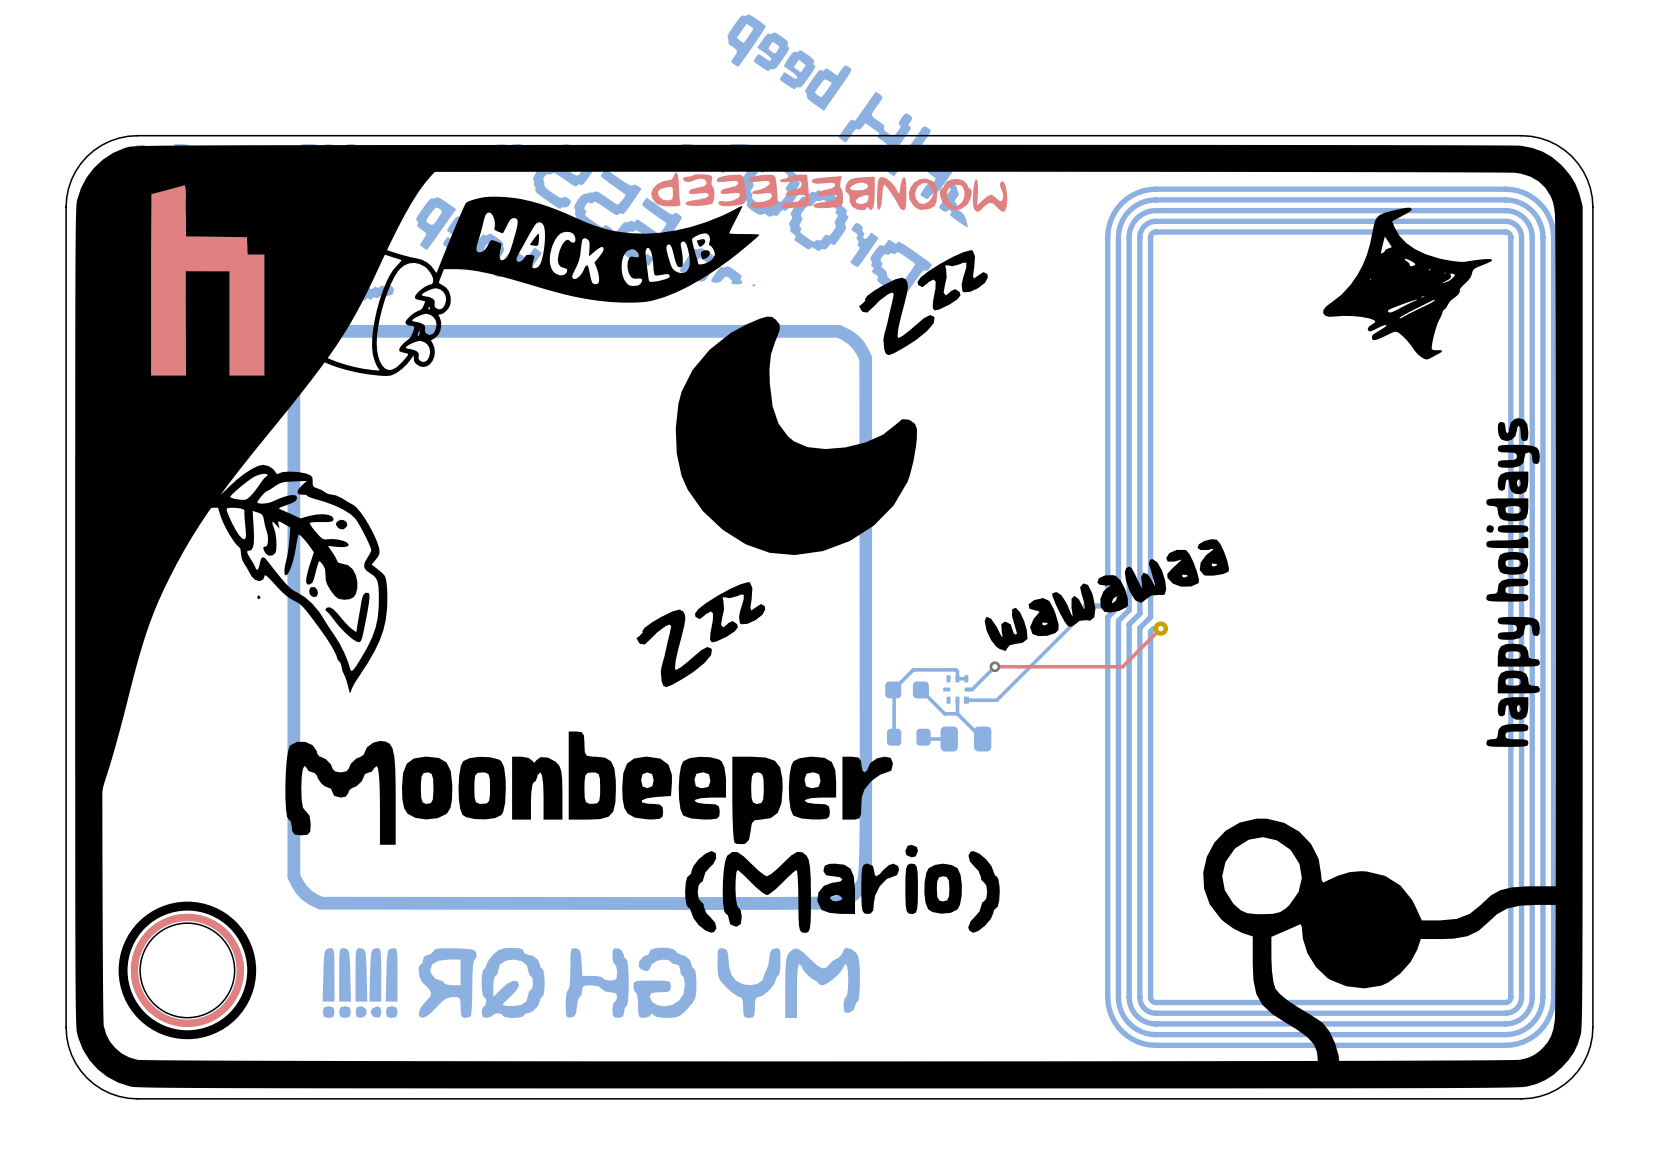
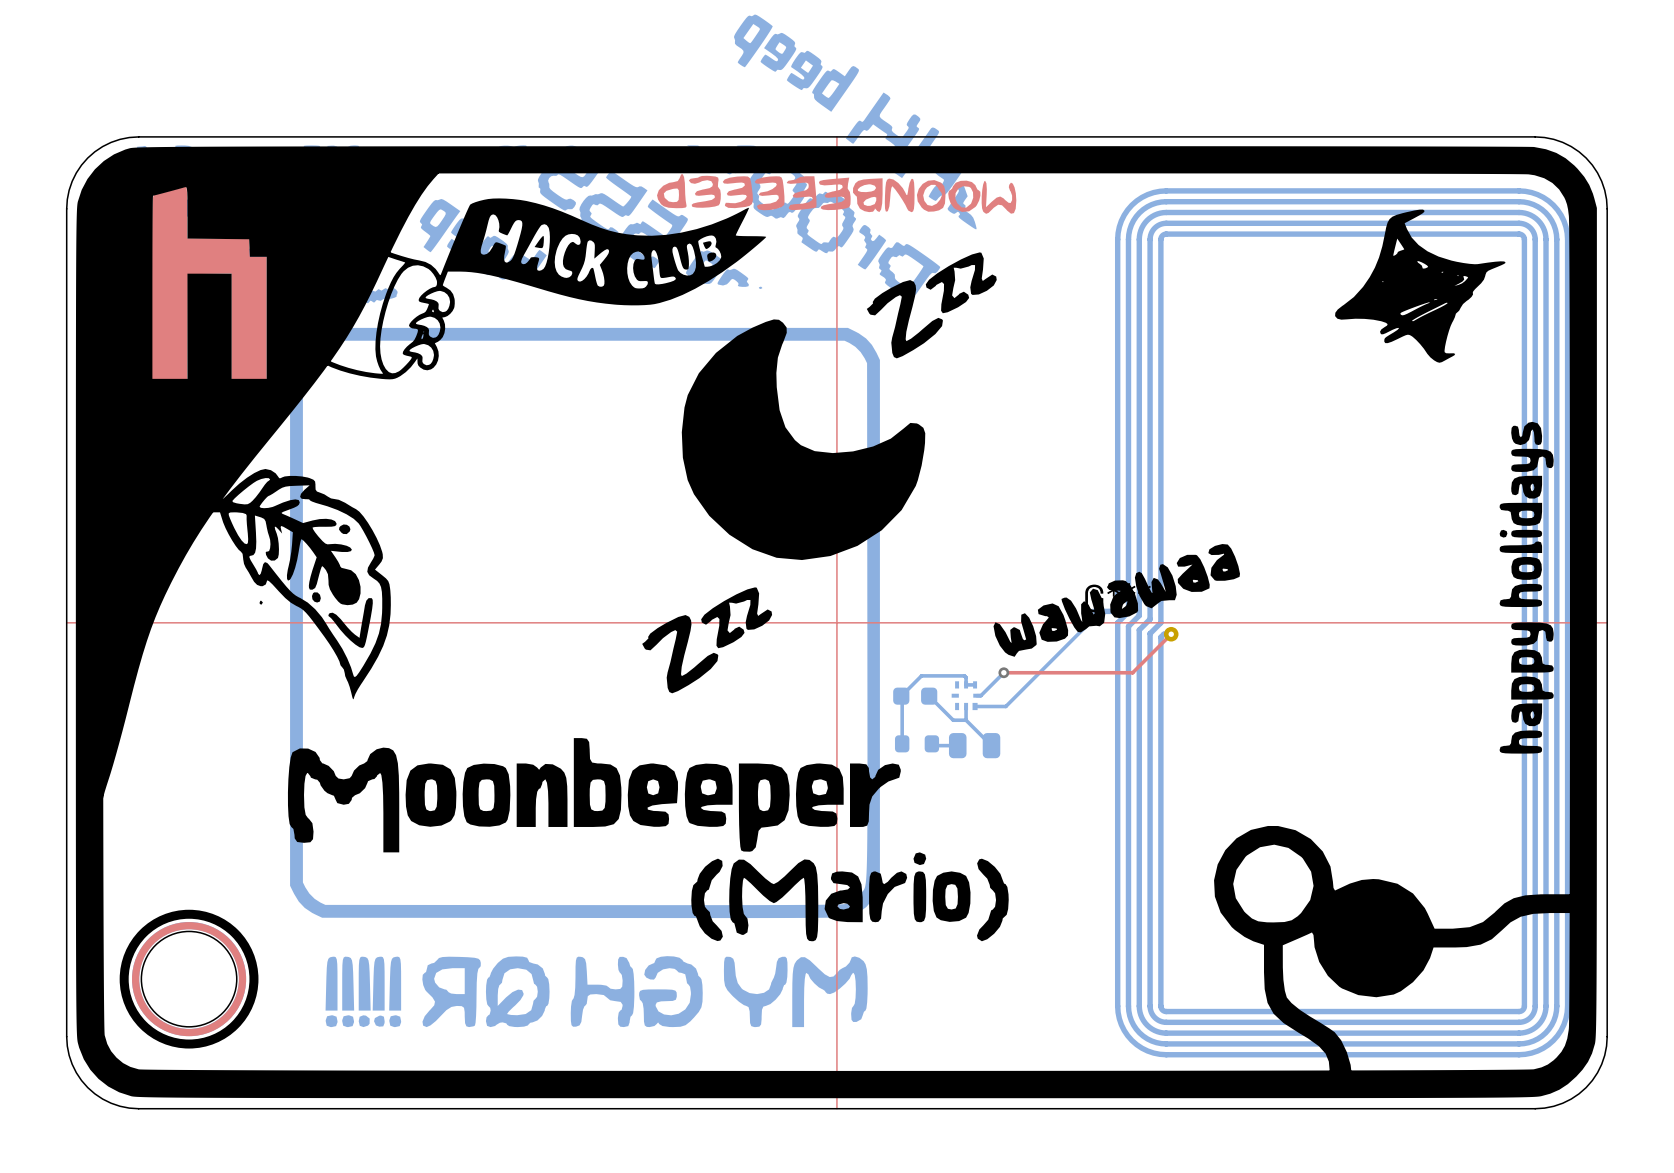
top track: none -> (836, 136) (836, 1108)
drawing: [636, 250, 1229, 688] -> none
part: none -> (819, 472)
part: none -> (1116, 600)
top track: none -> (66, 622) (1607, 622)

